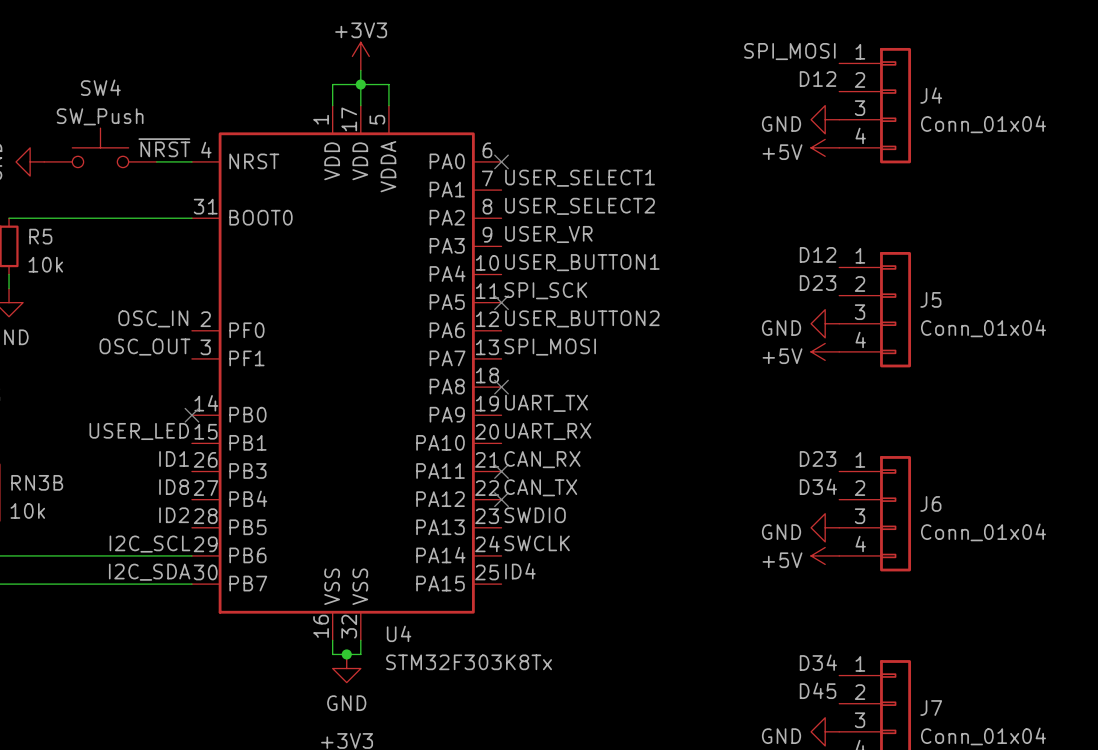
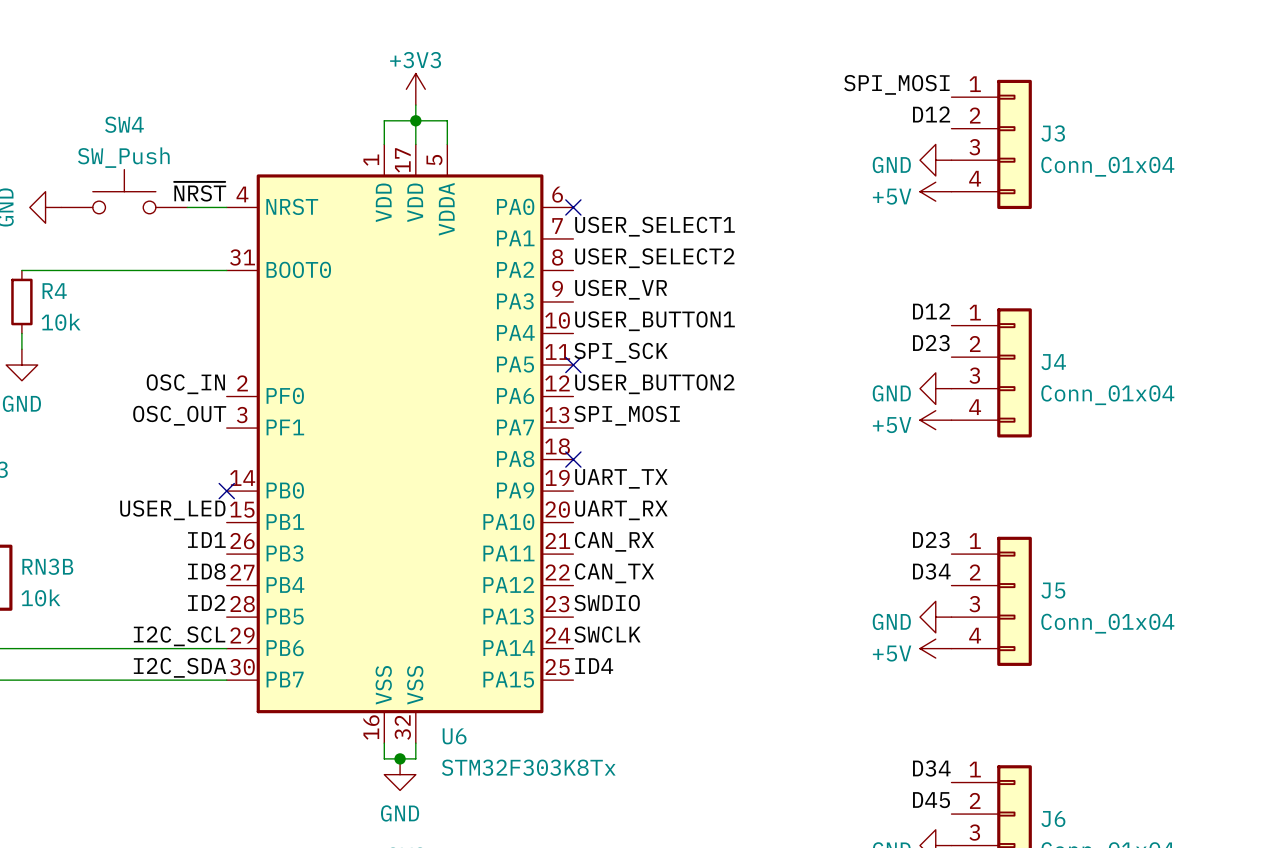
J4 name: J4 (931, 95) -> J3 (1053, 133)
R5 name: R5 (40, 236) -> R4 (54, 291)
J5 name: J5 (930, 299) -> J4 (1053, 362)
no-connect mark: (501, 471) -> none
no-connect mark: (501, 499) -> none
J6 name: J6 (930, 503) -> J5 (1053, 590)
U4 name: U4 (399, 633) -> U6 (454, 736)
J7 name: J7 (931, 708) -> J6 (1053, 819)

